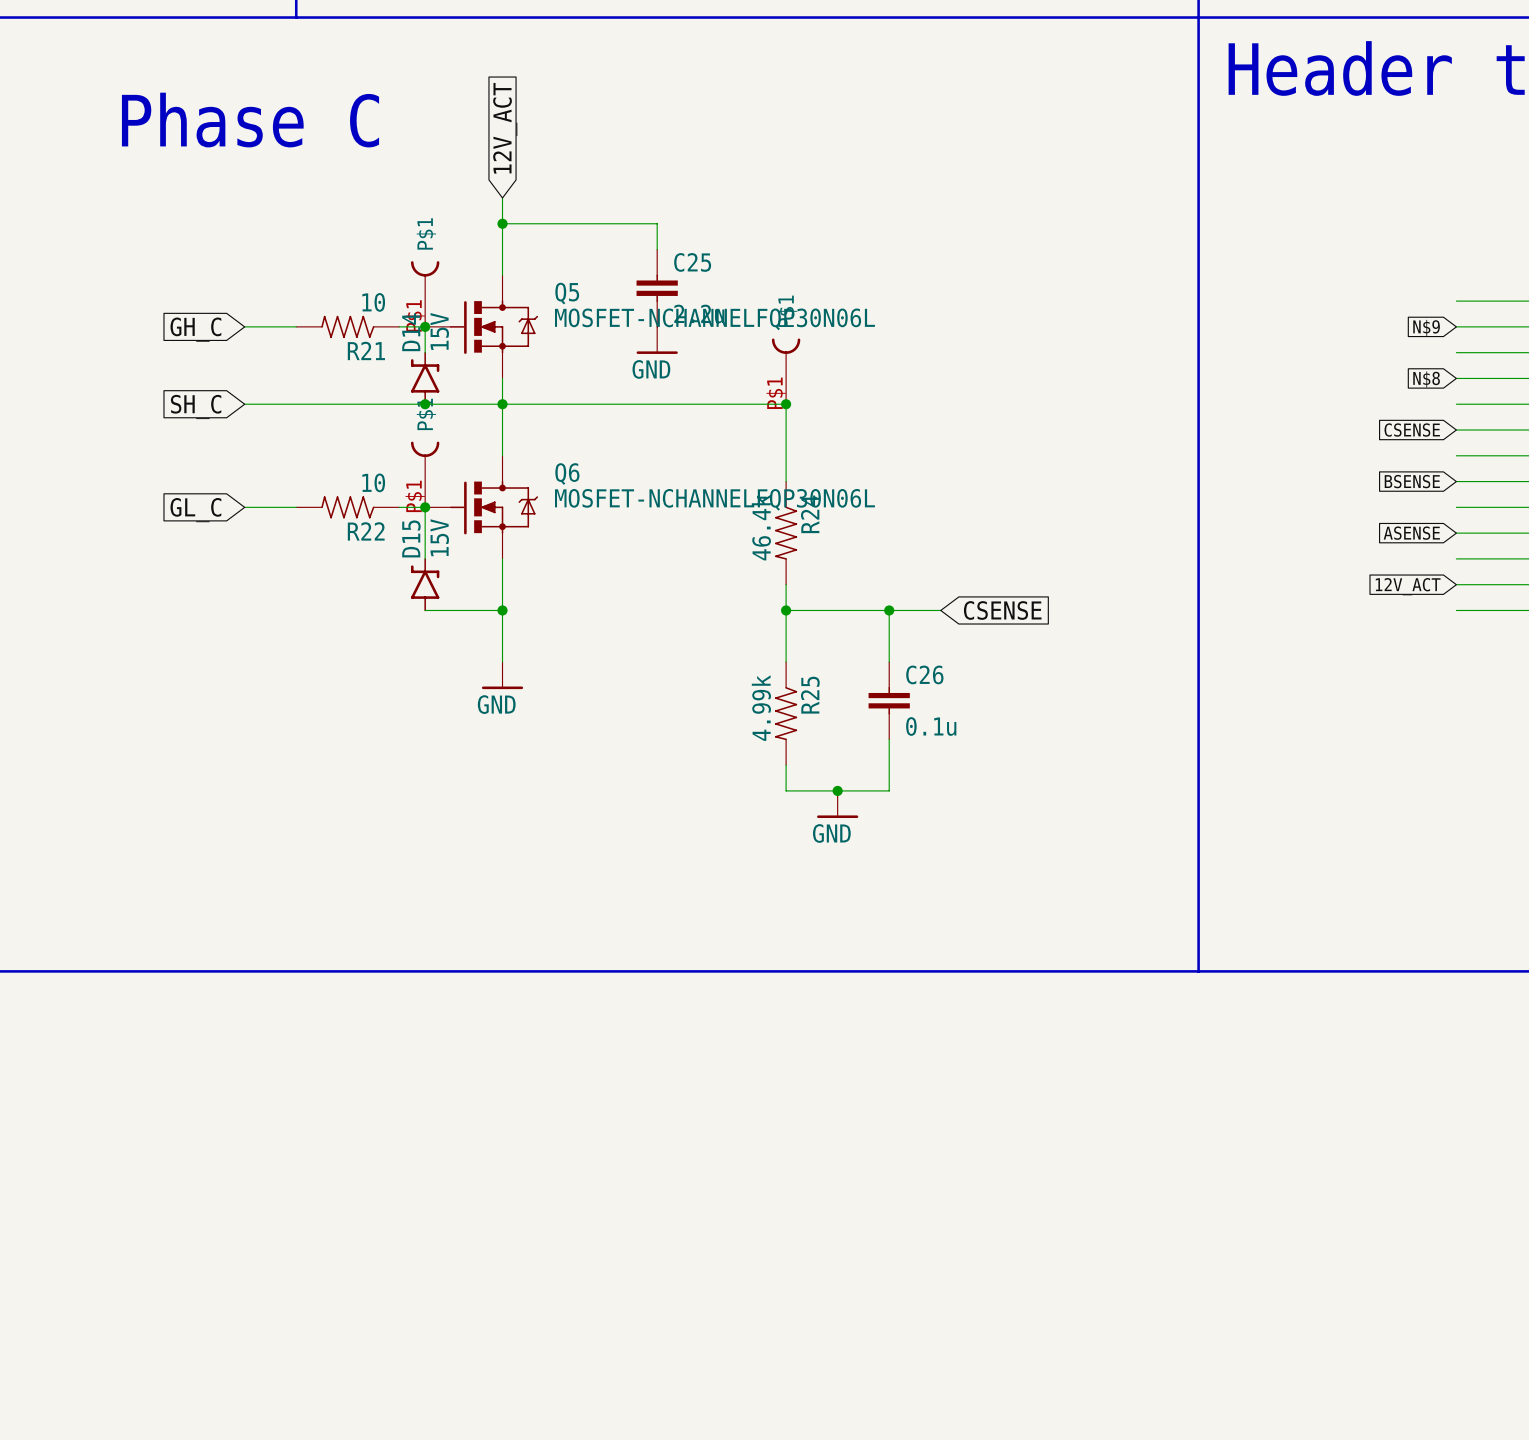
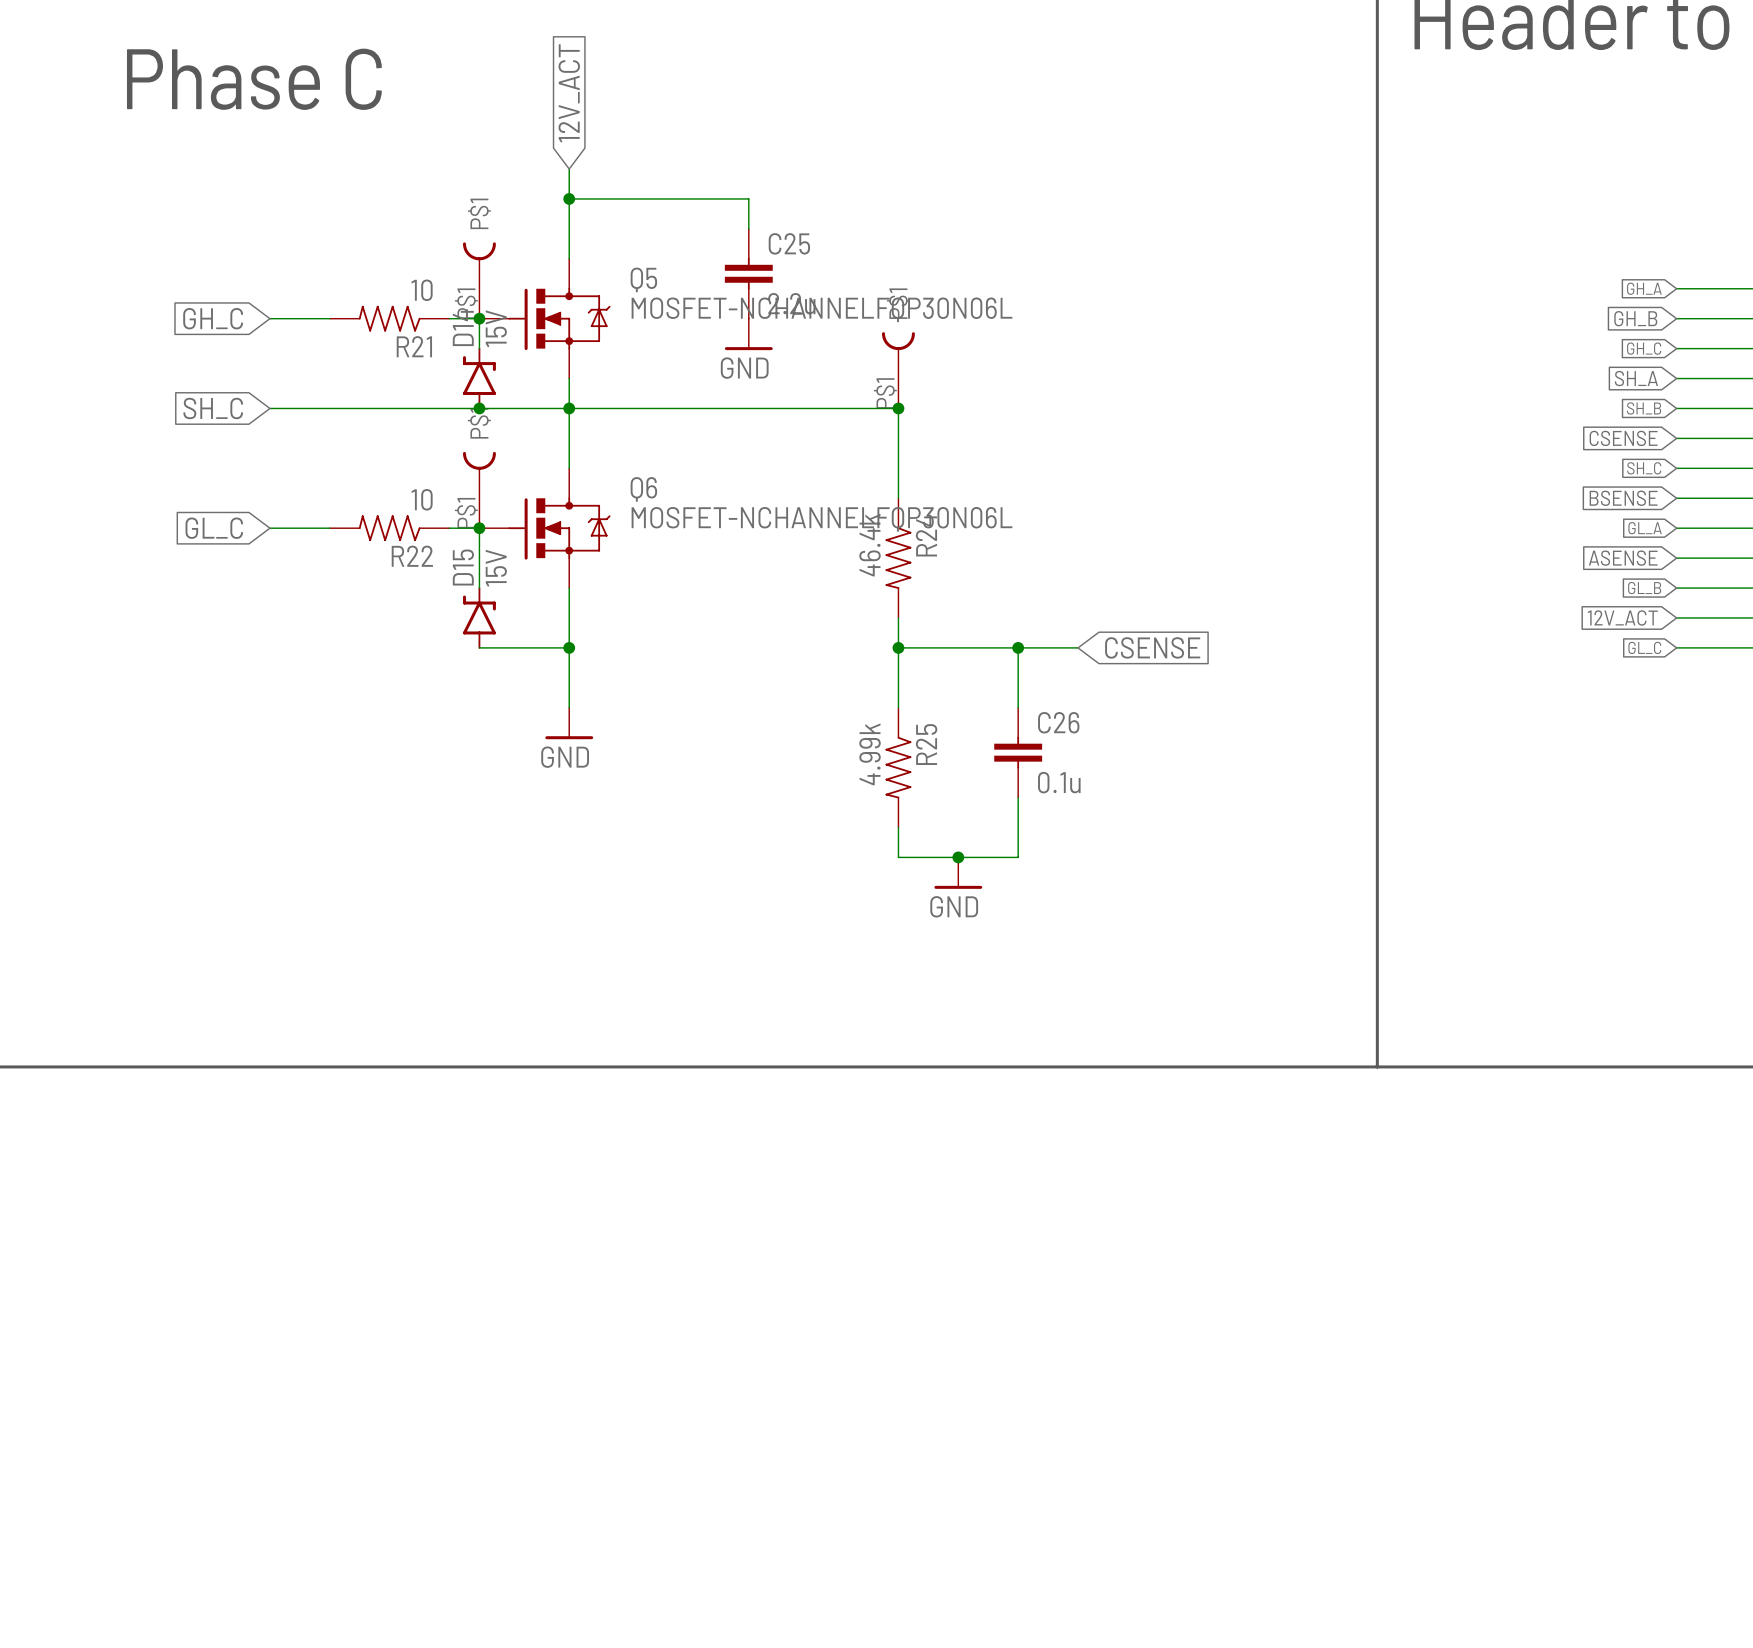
global label: none -> GH_A (1644, 288)
global label: N$9 (1426, 327) -> GH_B (1635, 318)
global label: none -> GH_C (1644, 348)
global label: N$8 (1426, 379) -> SH_A (1636, 378)
global label: none -> SH_B (1644, 408)
global label: none -> SH_C (1644, 468)
global label: none -> GL_A (1645, 528)
global label: none -> GL_B (1644, 588)
global label: none -> GL_C (1644, 647)

